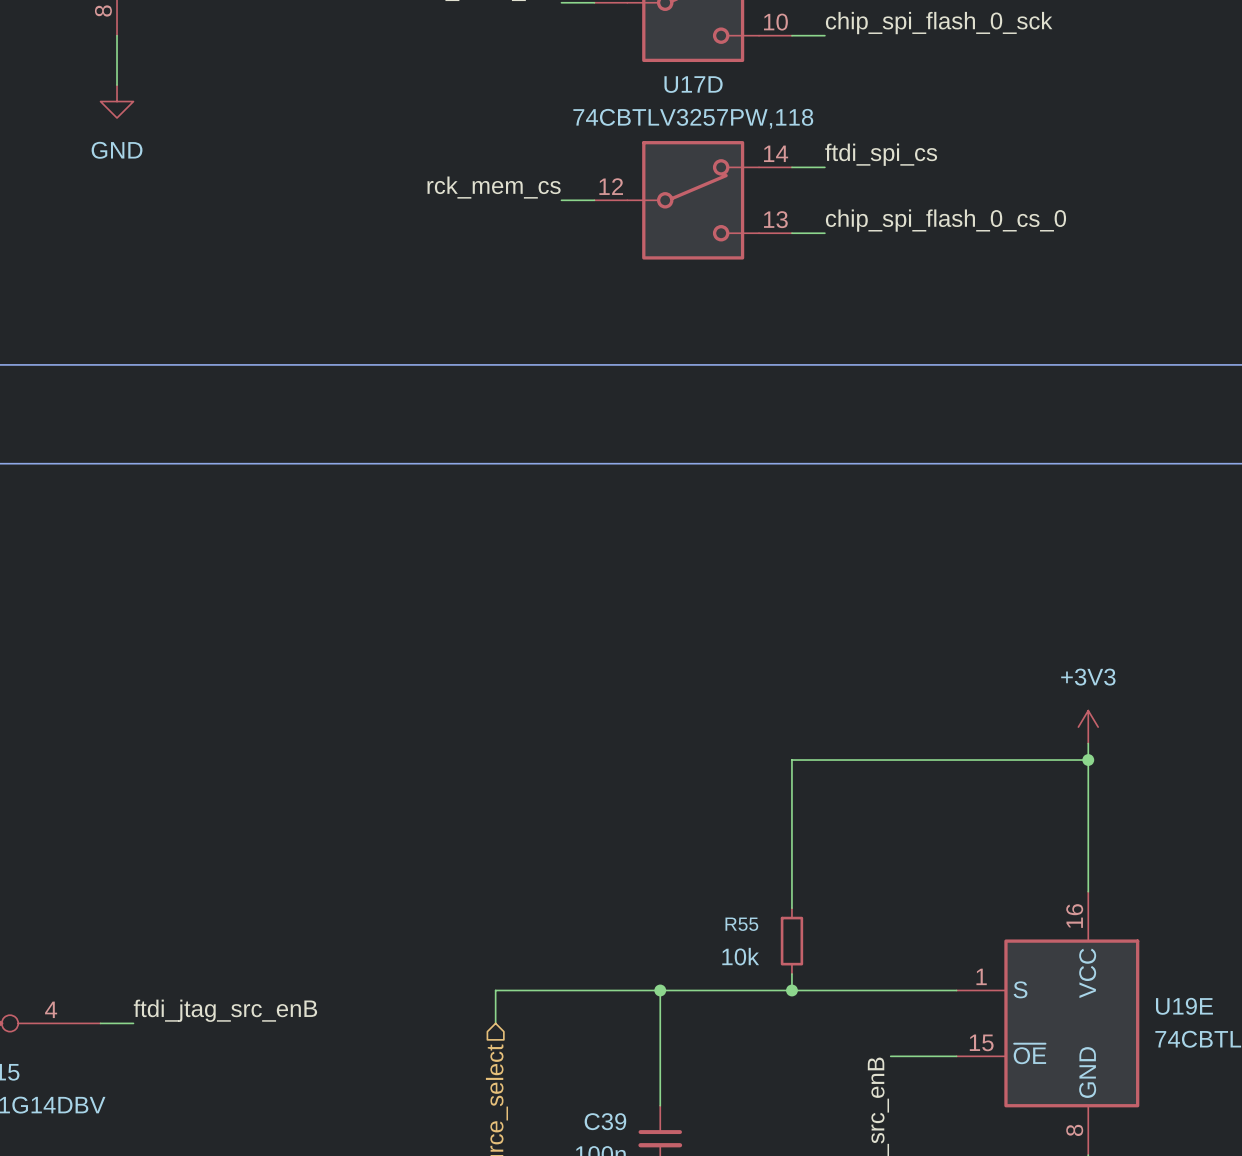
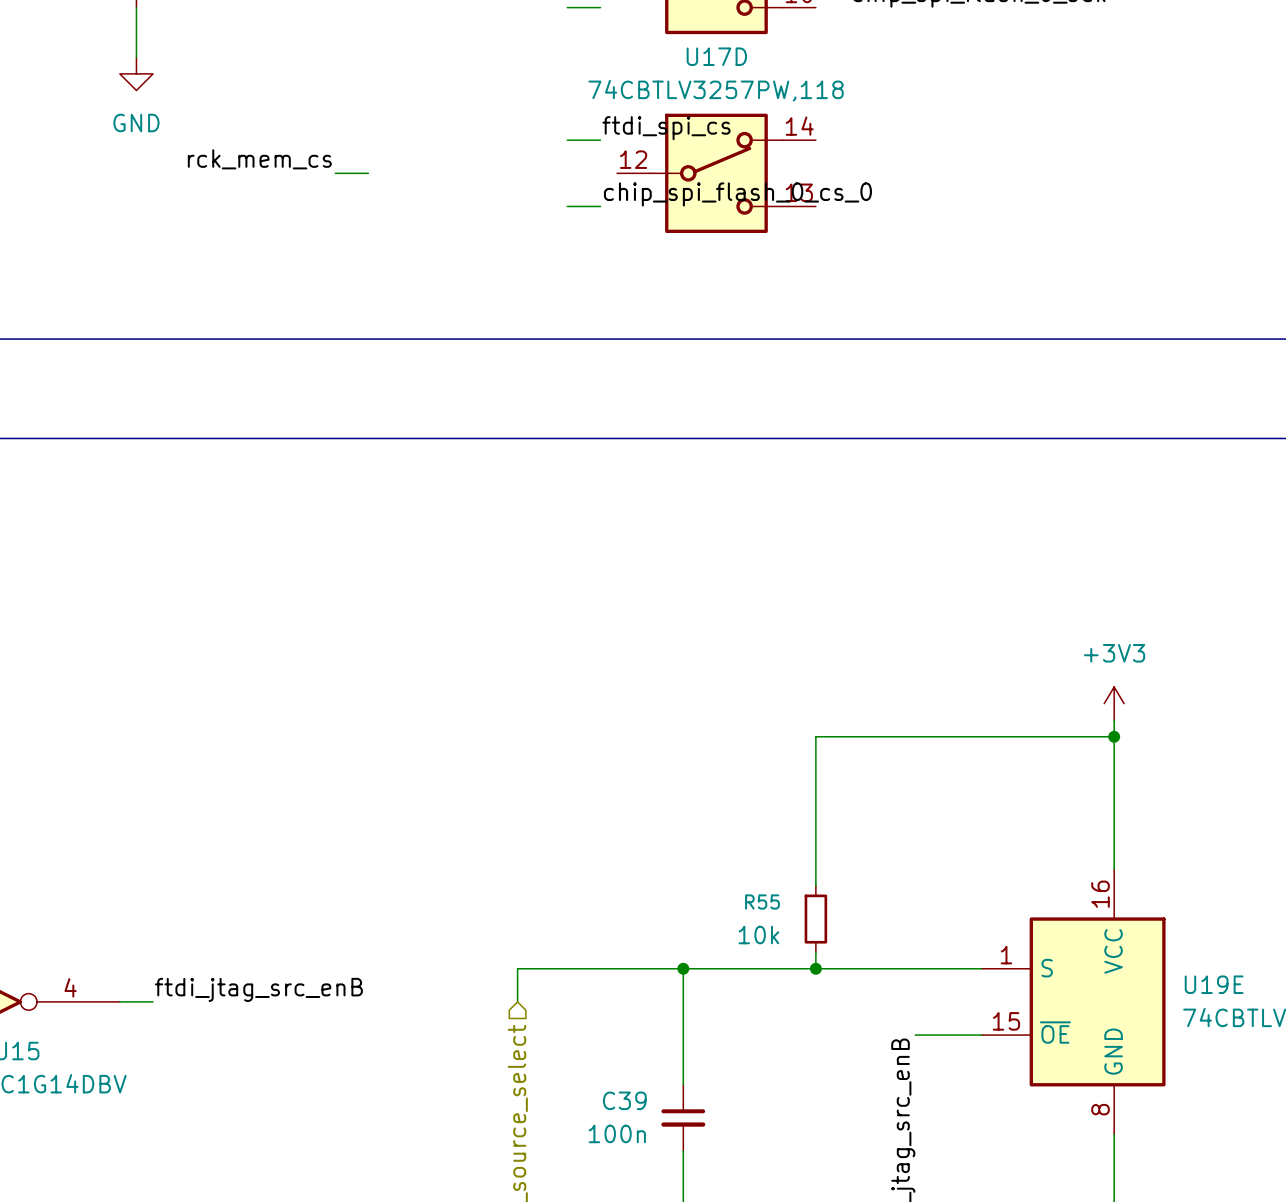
wire: (791, 35) (824, 35) -> (567, 7) (600, 7)
label position: ftdi_spi_cs (881, 154) -> ftdi_spi_cs (666, 128)
wire: (791, 167) (824, 167) -> (567, 140) (600, 140)
label position: rck_mem_cs (494, 187) -> rck_mem_cs (259, 159)
wire: (561, 200) (594, 200) -> (335, 173) (368, 173)
label position: chip_spi_flash_0_cs_0 (945, 220) -> chip_spi_flash_0_cs_0 (737, 194)
wire: (791, 233) (824, 233) -> (567, 206) (600, 206)

